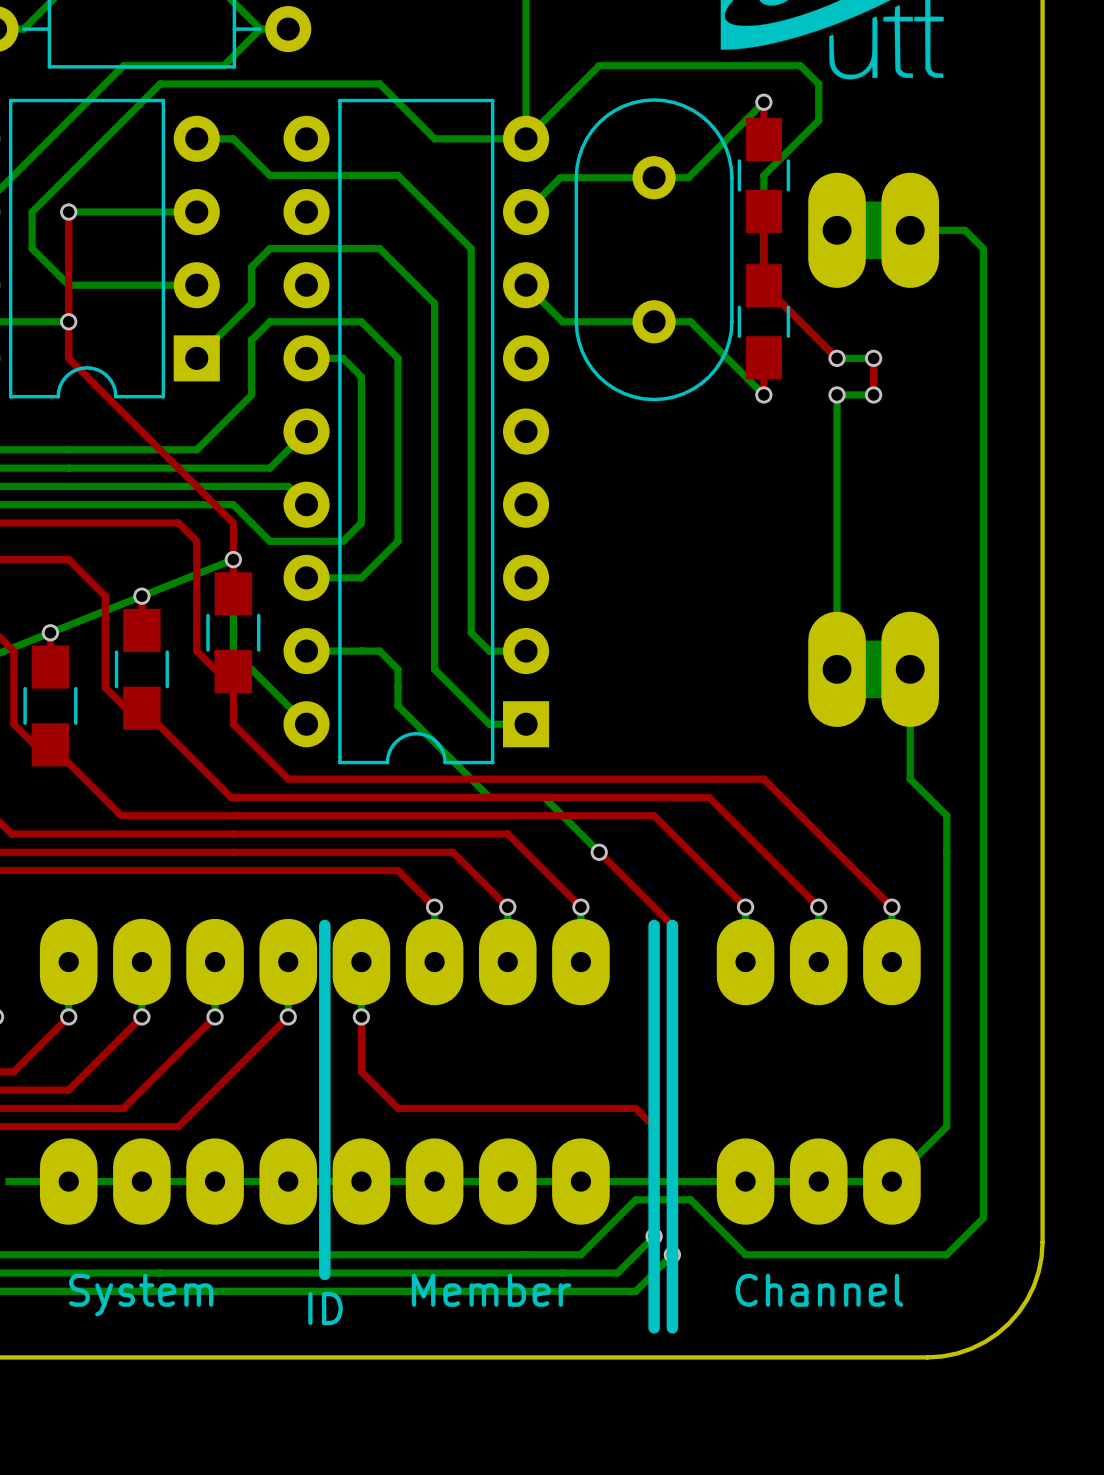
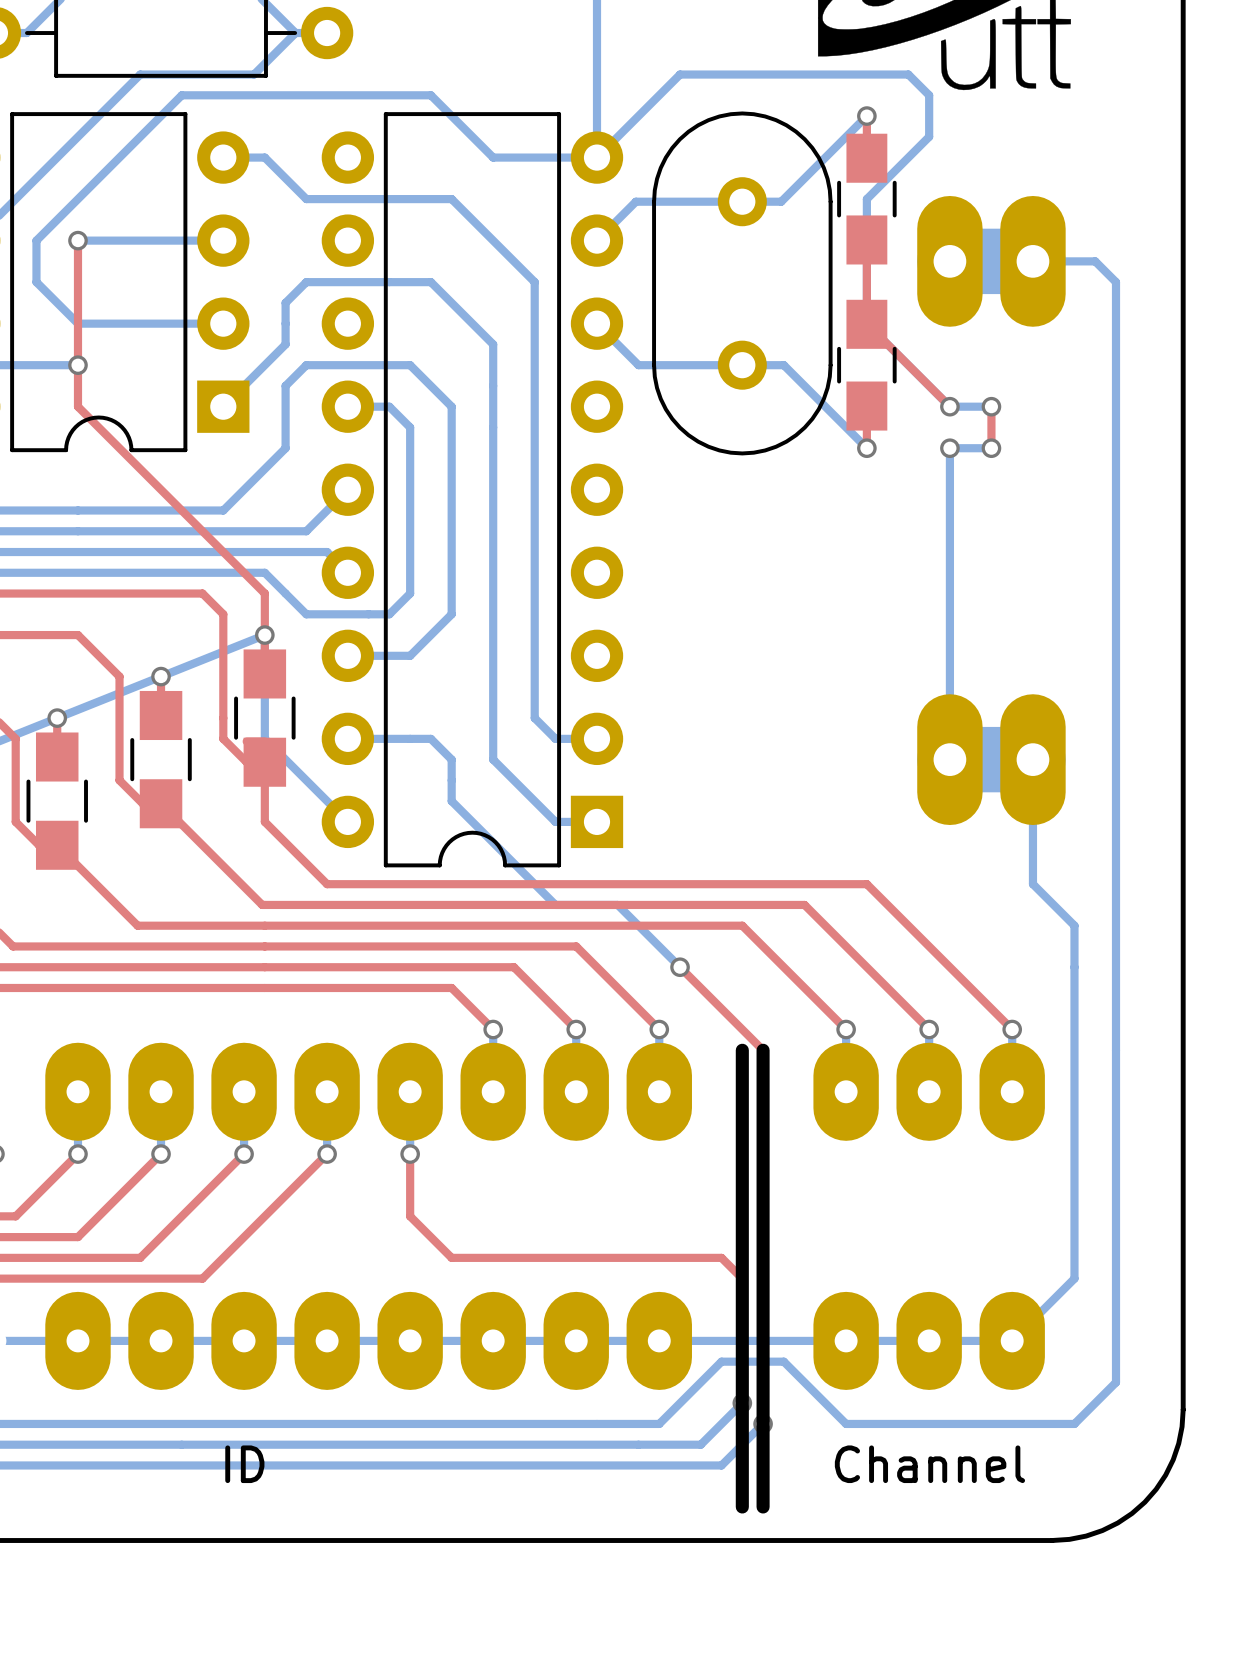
line: (324, 925) (324, 1274) -> none
text: Member (491, 1290) -> none
text: System (141, 1295) -> none
text position: ID (325, 1308) -> ID (244, 1464)

